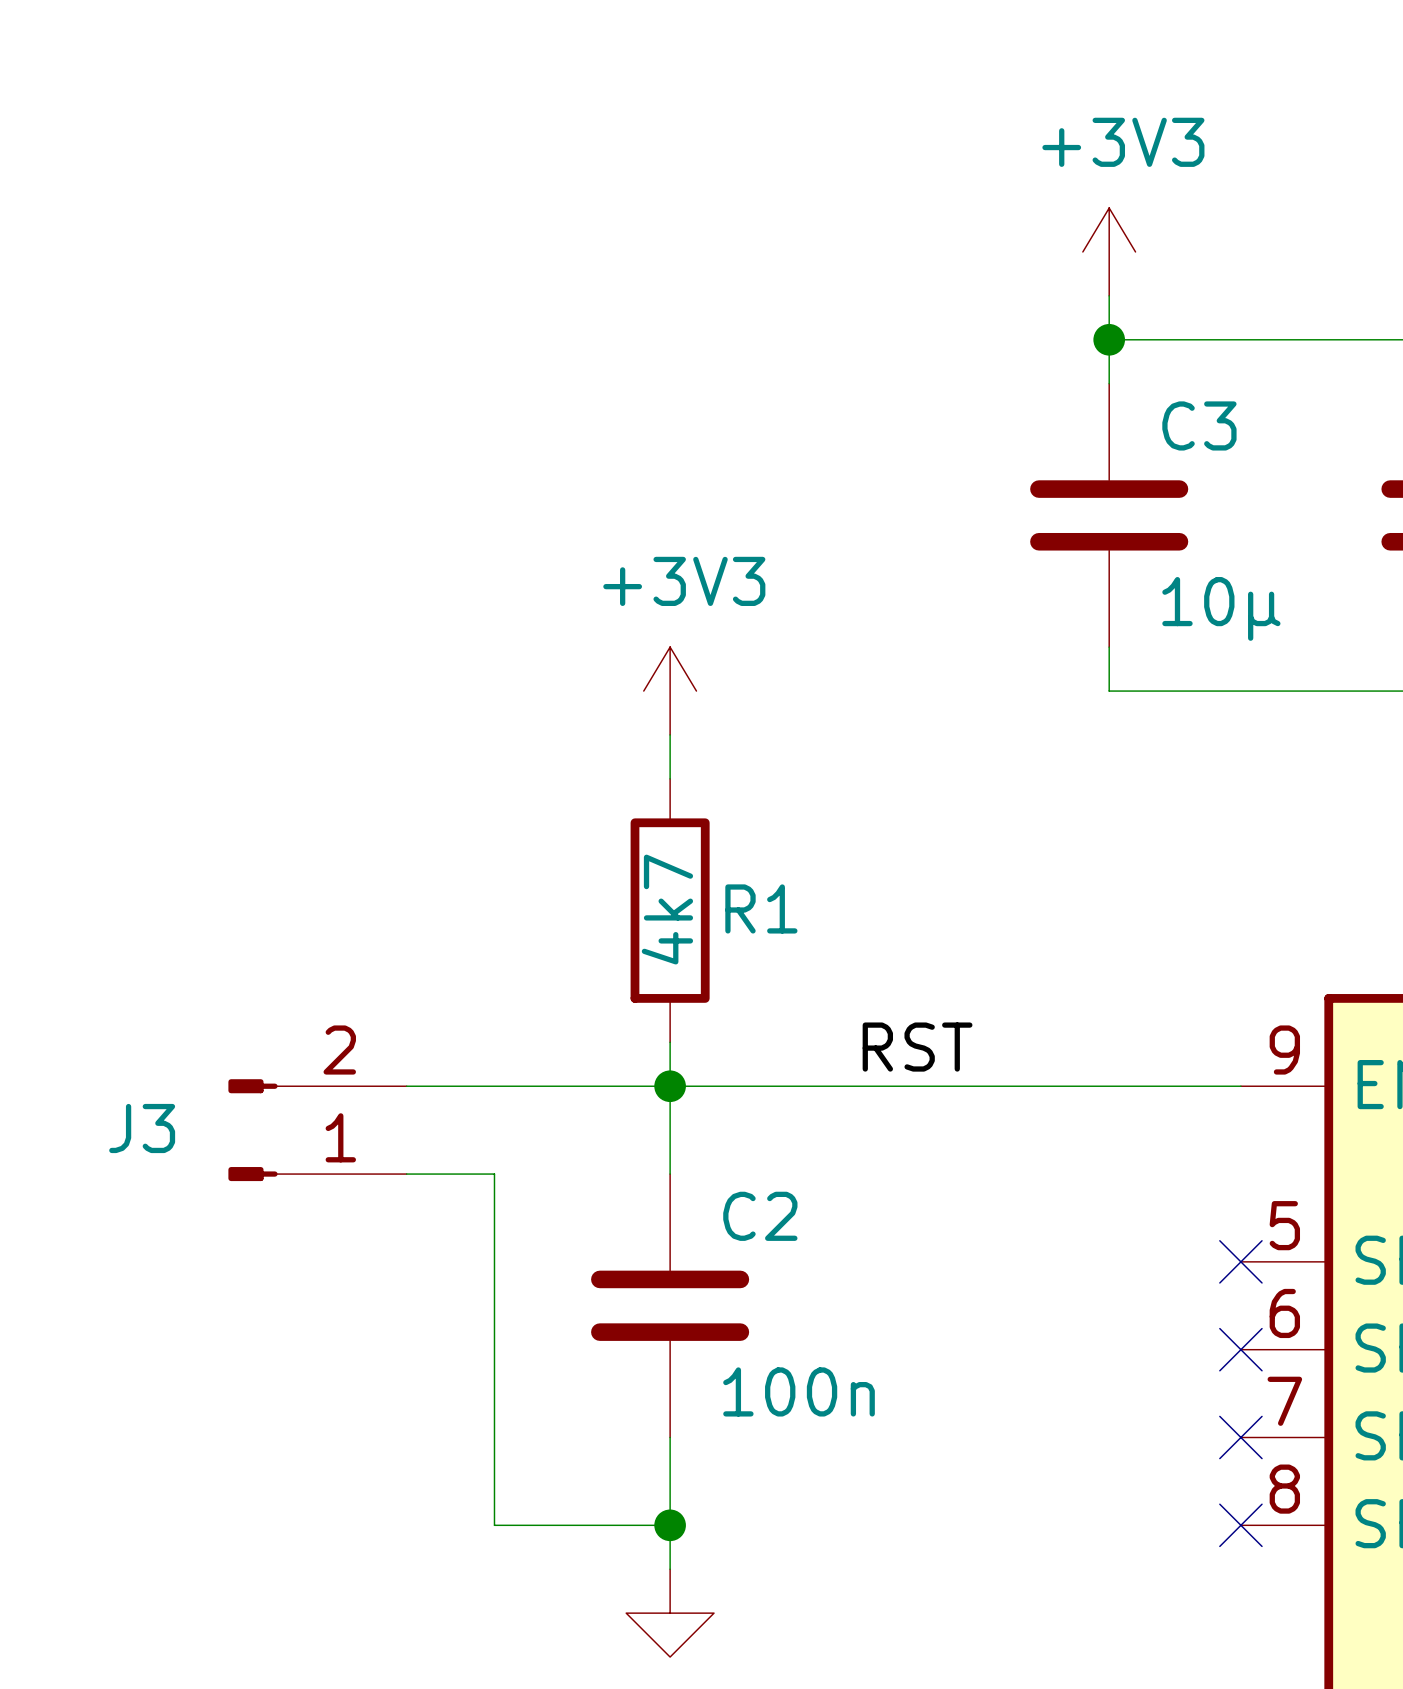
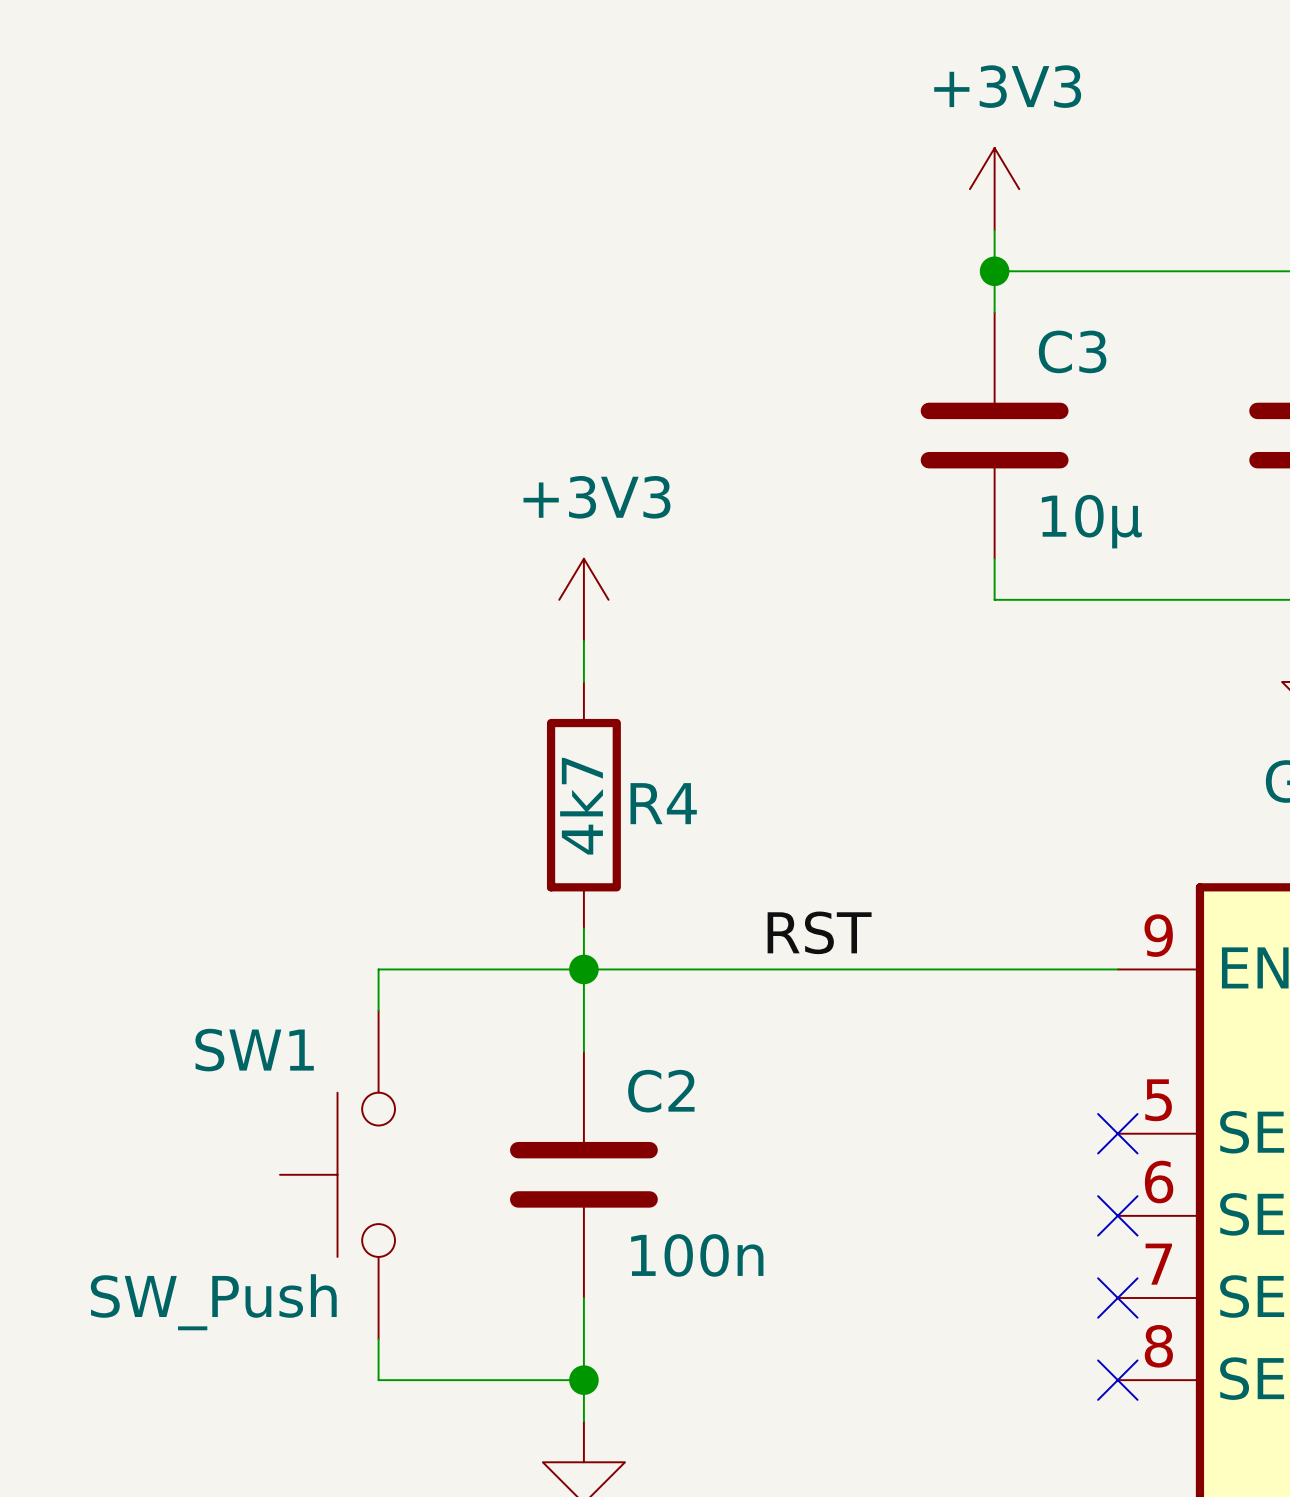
R1 name: R1 (761, 908) -> R4 (663, 803)
wire: (406, 1086) (450, 1086) -> (378, 1010) (378, 969)
J3: (317, 1130) -> none
wire: (406, 1174) (494, 1174) (494, 1525) -> (378, 1339) (378, 1380) (419, 1380)
SW1: none -> SW_Push (337, 1174)

